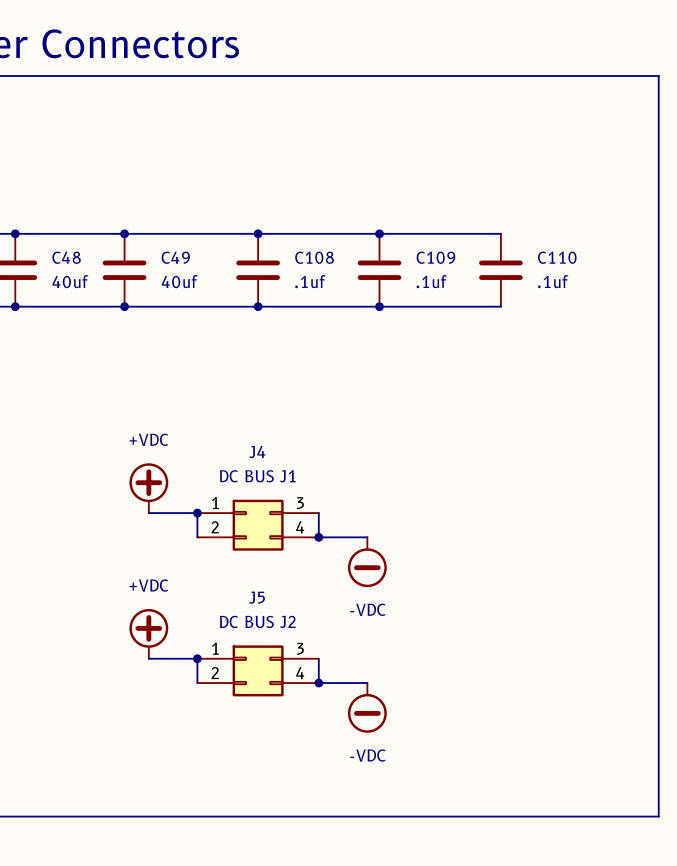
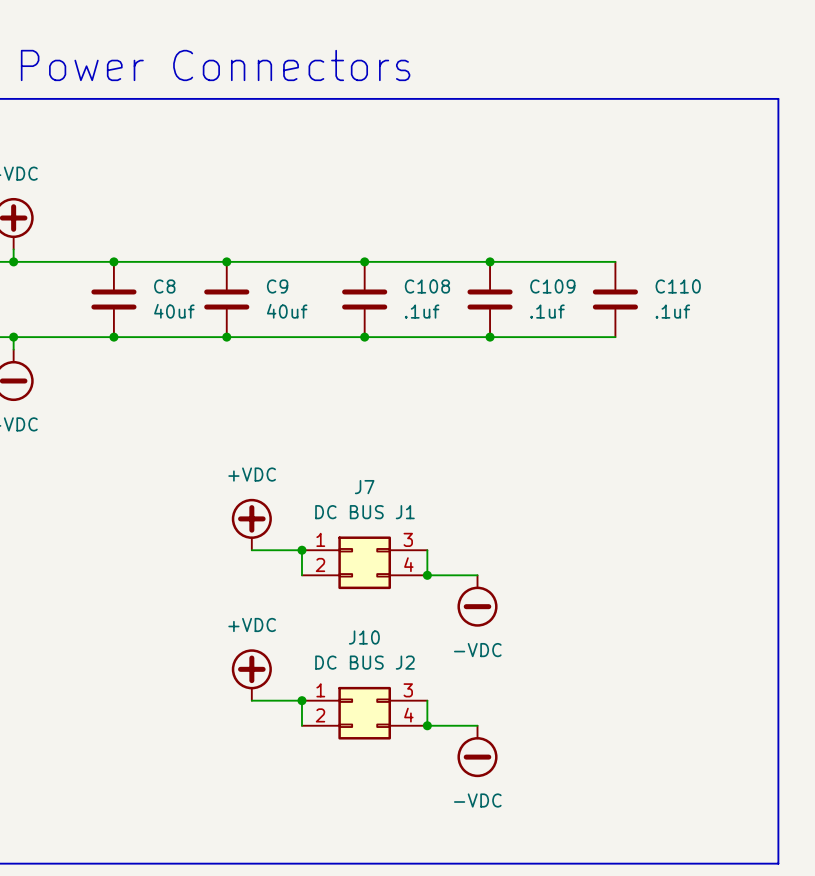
C48 name: C48 (66, 257) -> C8 (164, 286)
C49 name: C49 (175, 257) -> C9 (277, 286)
J4 name: J4 (257, 451) -> J7 (364, 487)
J5 name: J5 (257, 597) -> J10 (364, 637)

